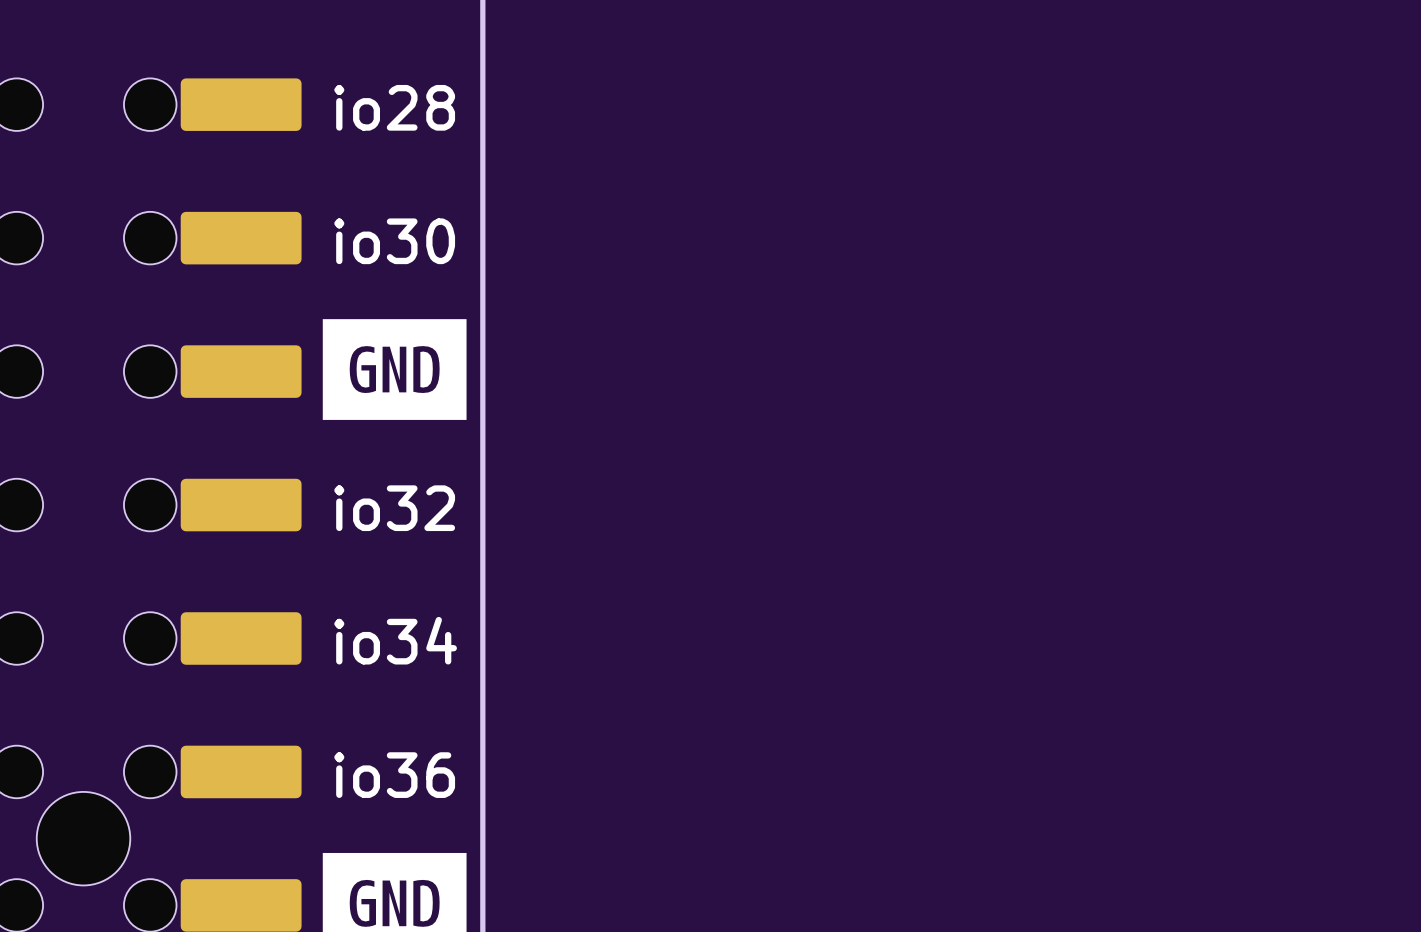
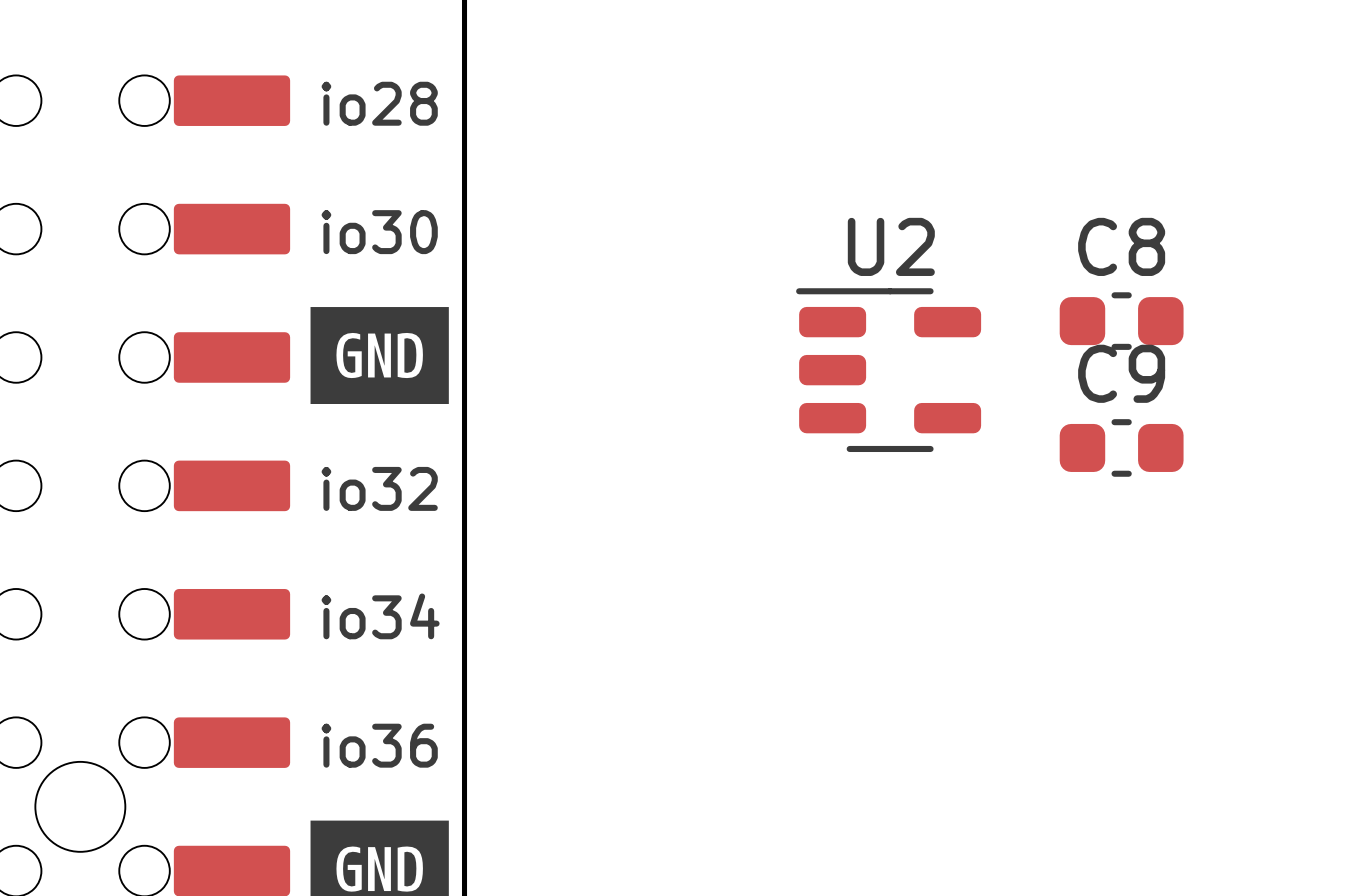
C8: none -> (1121, 321)
U2: none -> (888, 370)
C9: none -> (1121, 447)

